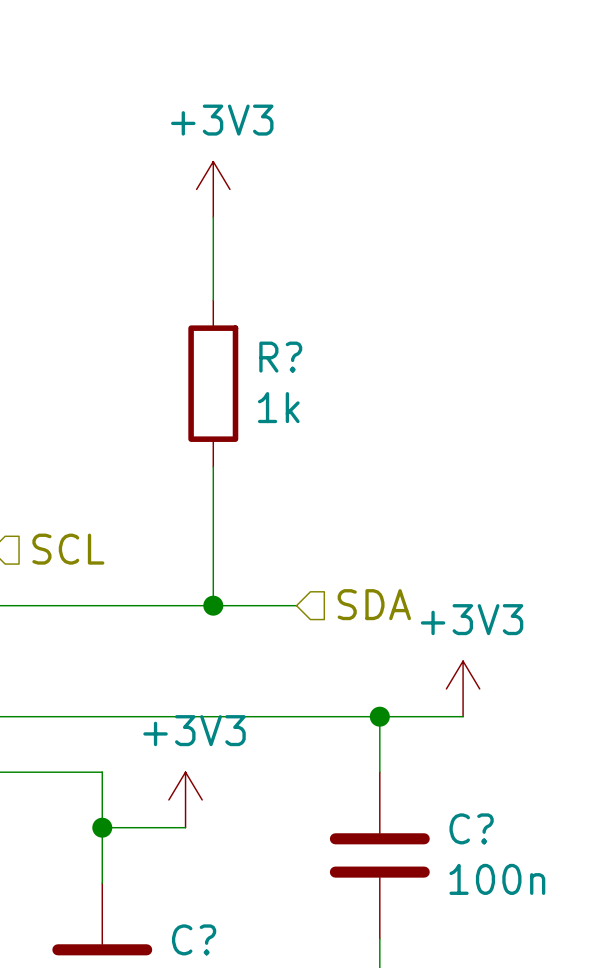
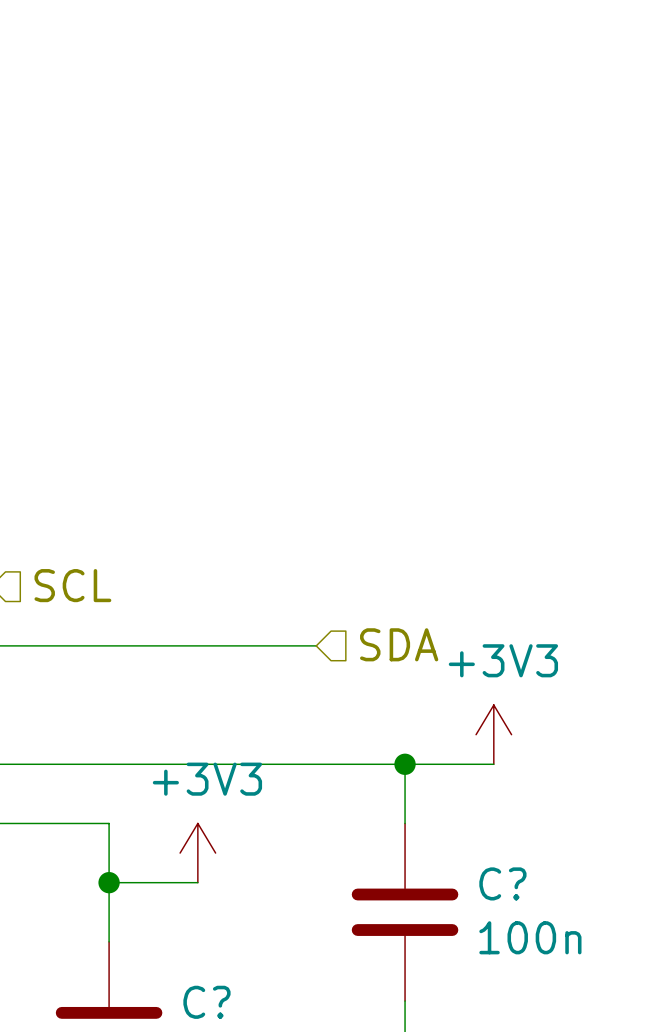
power symbol: +3V3 (213, 189) -> none
wire: (213, 217) (213, 300) -> none
R?: 1k (213, 383) -> none
wire: (213, 466) (213, 605) -> none
junction: (213, 605) -> none

